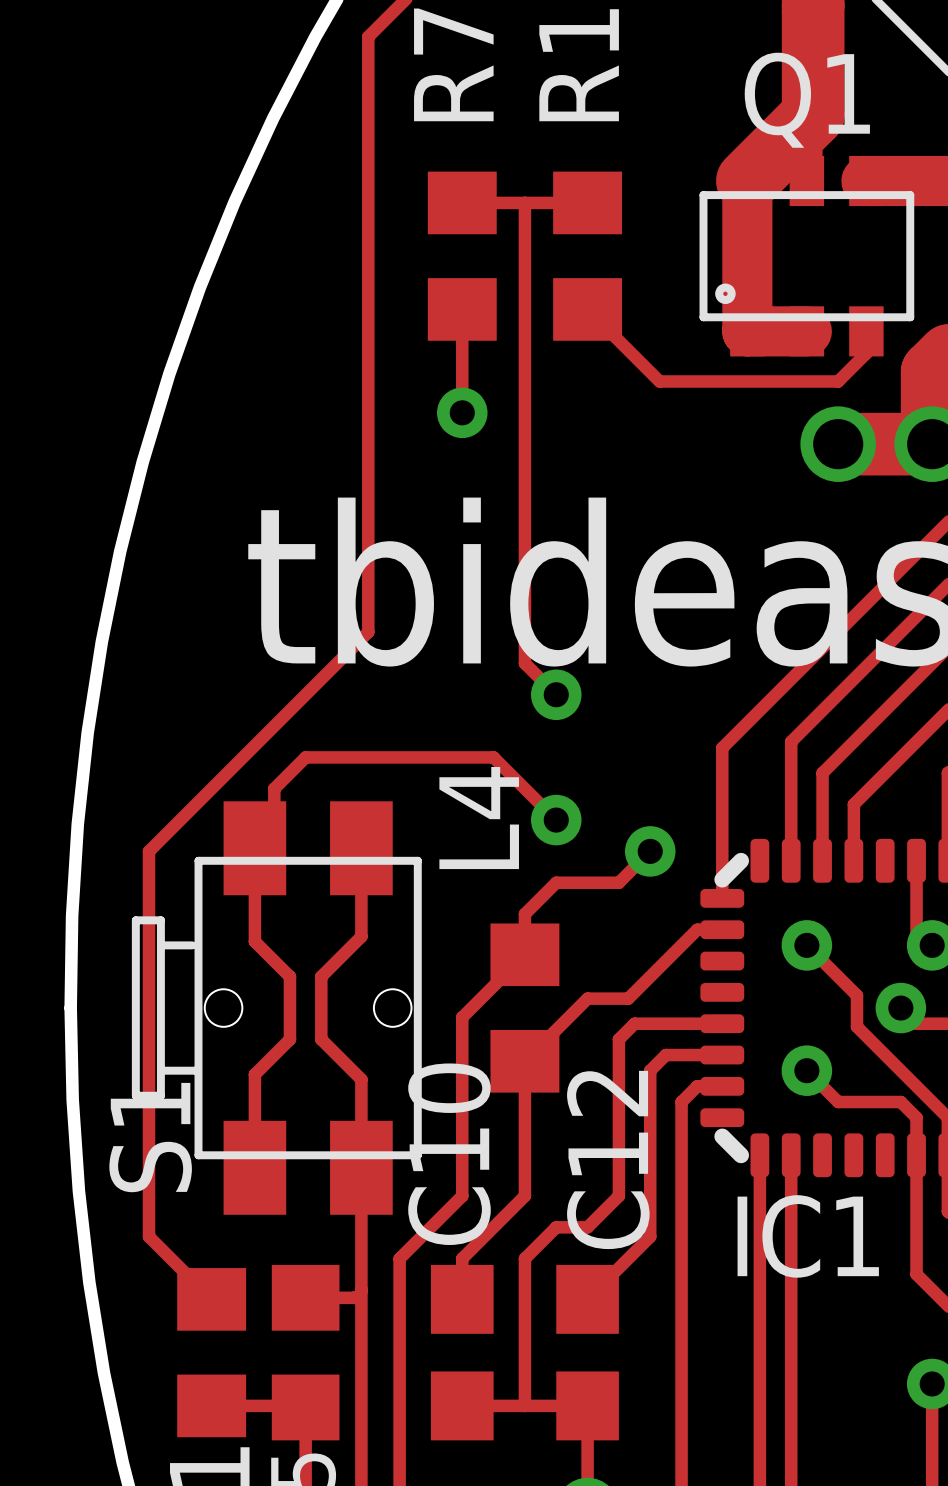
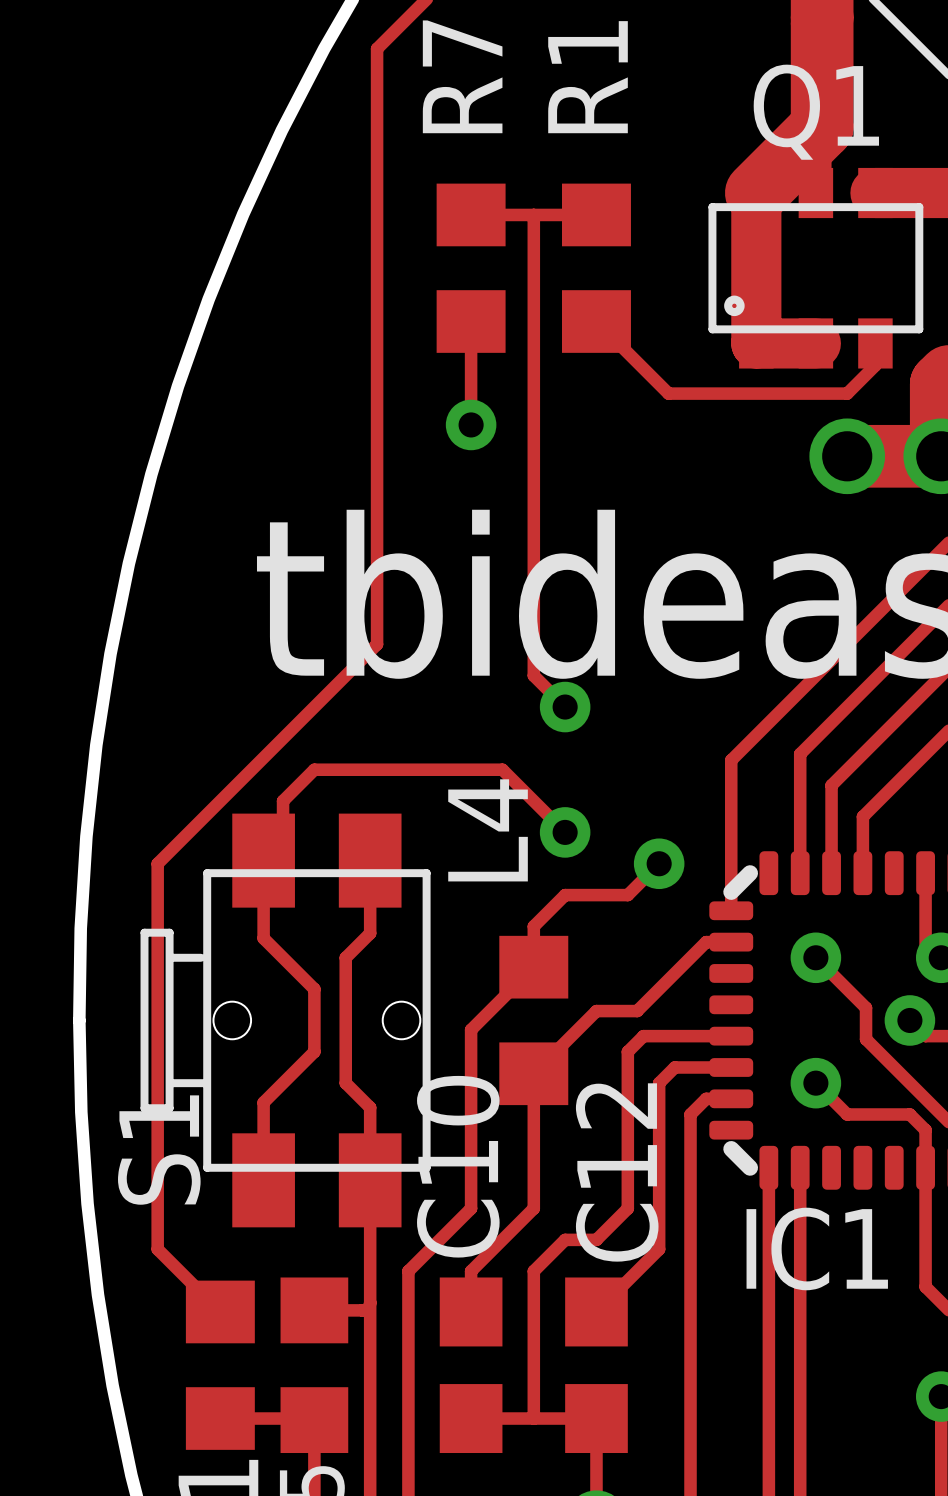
track: (361, 920) (361, 936) (321, 976) (321, 1039) (361, 1079) (361, 1095) -> (370, 933) (345, 957) (345, 1083) (370, 1107)
track: (254, 925) (254, 941) (289, 976) (289, 1039) (254, 1074) (254, 1090) -> (263, 938) (314, 989) (314, 1051) (263, 1102)

